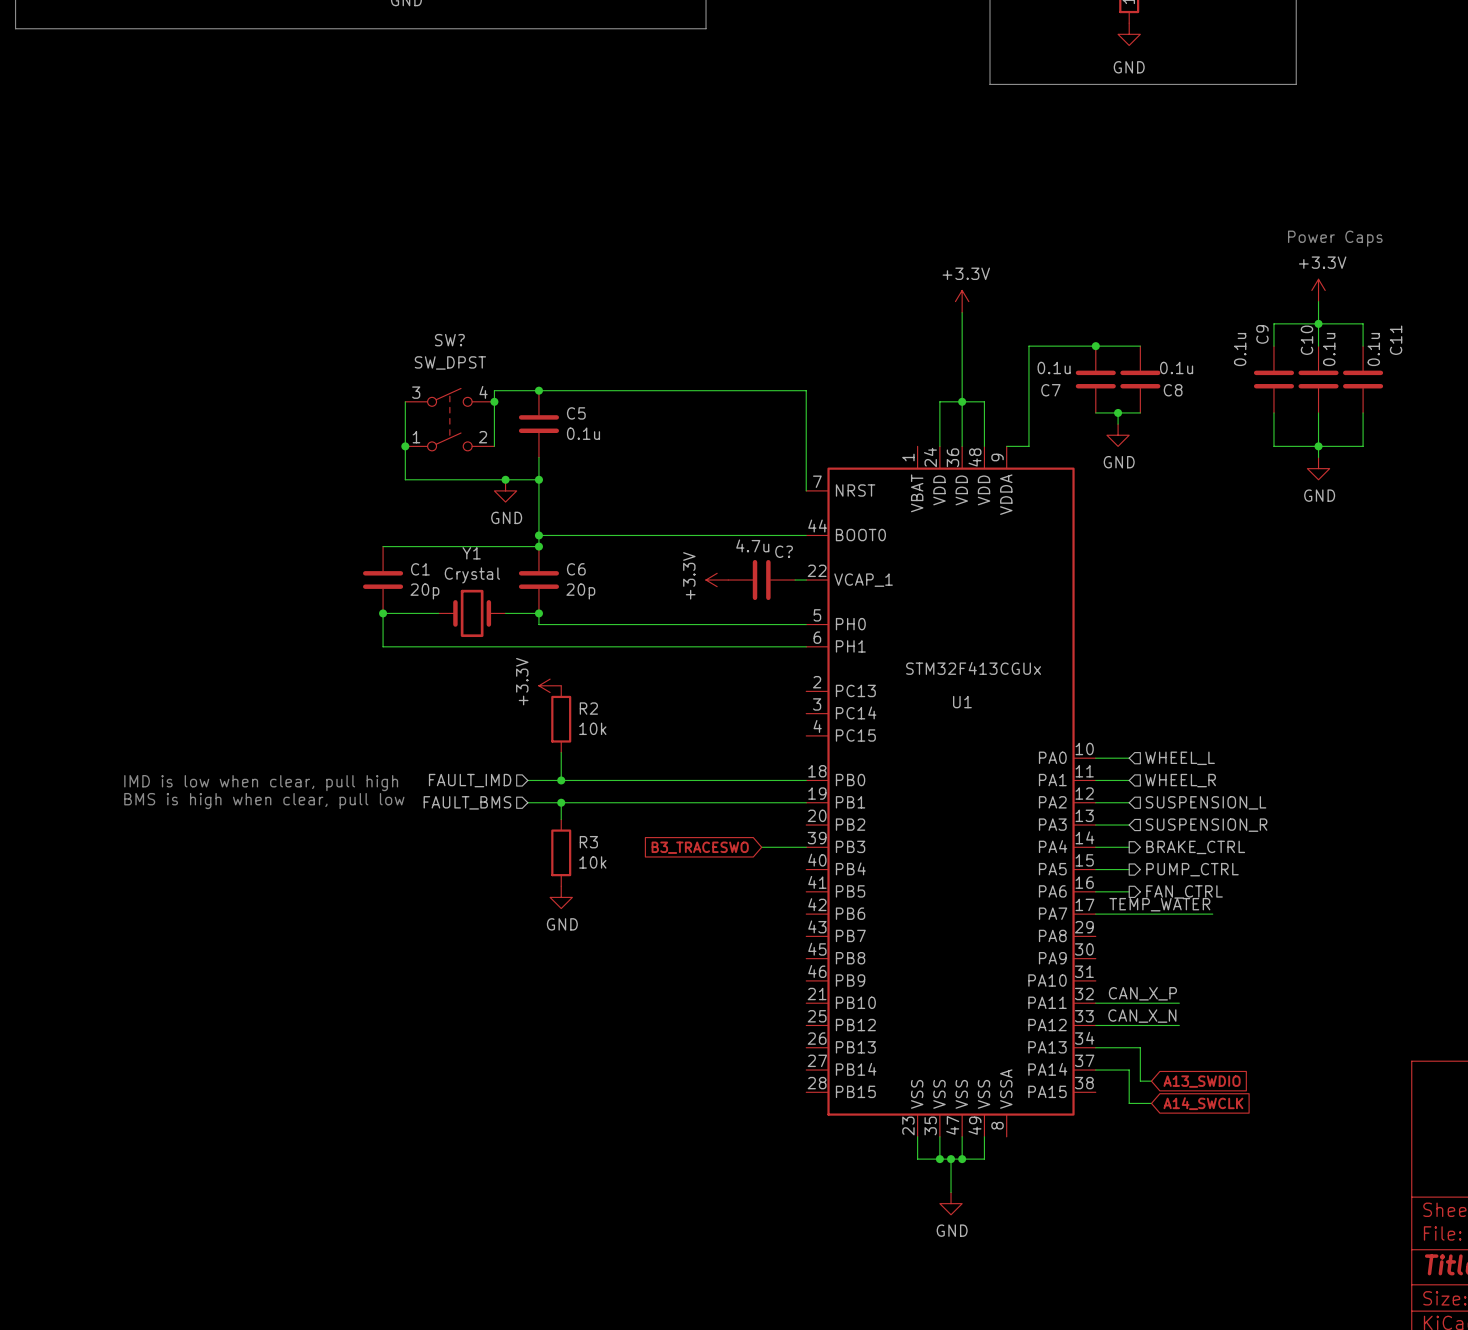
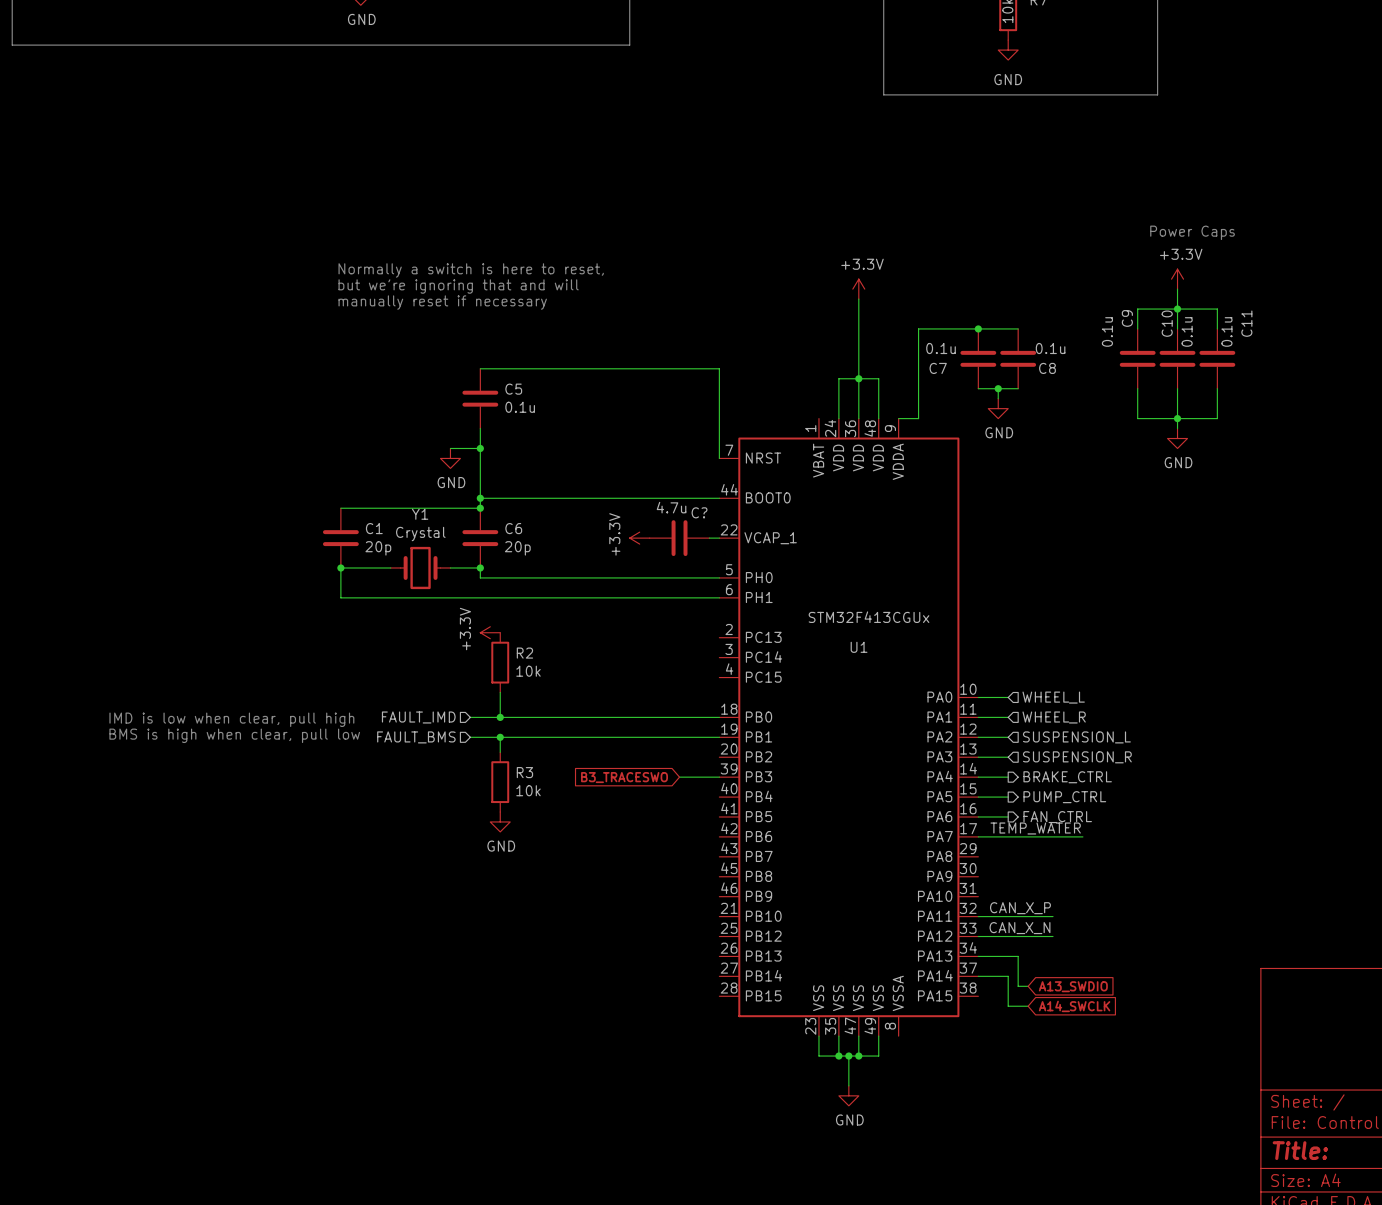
text: none -> Normally a switch is here to reset, (471, 270)
text: none -> but we're ignoring that and will (458, 286)
text: none -> manually reset if necessary (442, 302)
wire: (538, 390) (494, 390) (494, 446) -> none
junction: (538, 390) -> none
wire: (405, 401) (405, 479) (505, 479) -> none
junction: (494, 401) -> none
SW?: SW_DPST (449, 419) -> none
junction: (405, 446) -> none
junction: (505, 479) -> none

